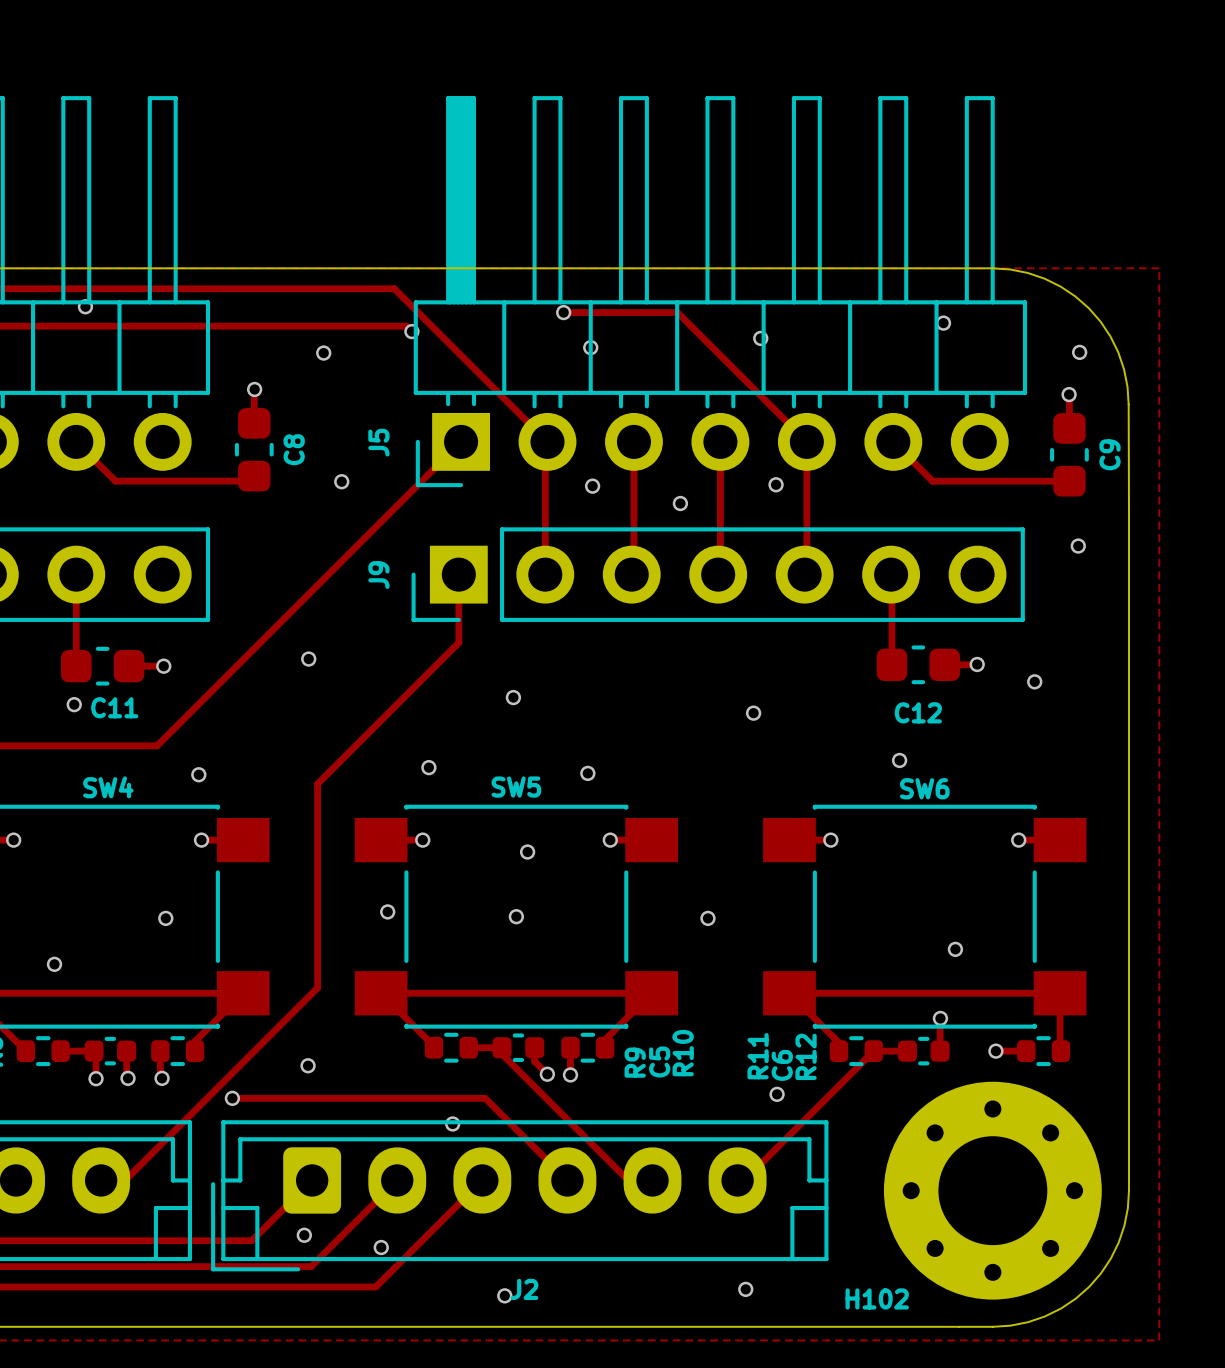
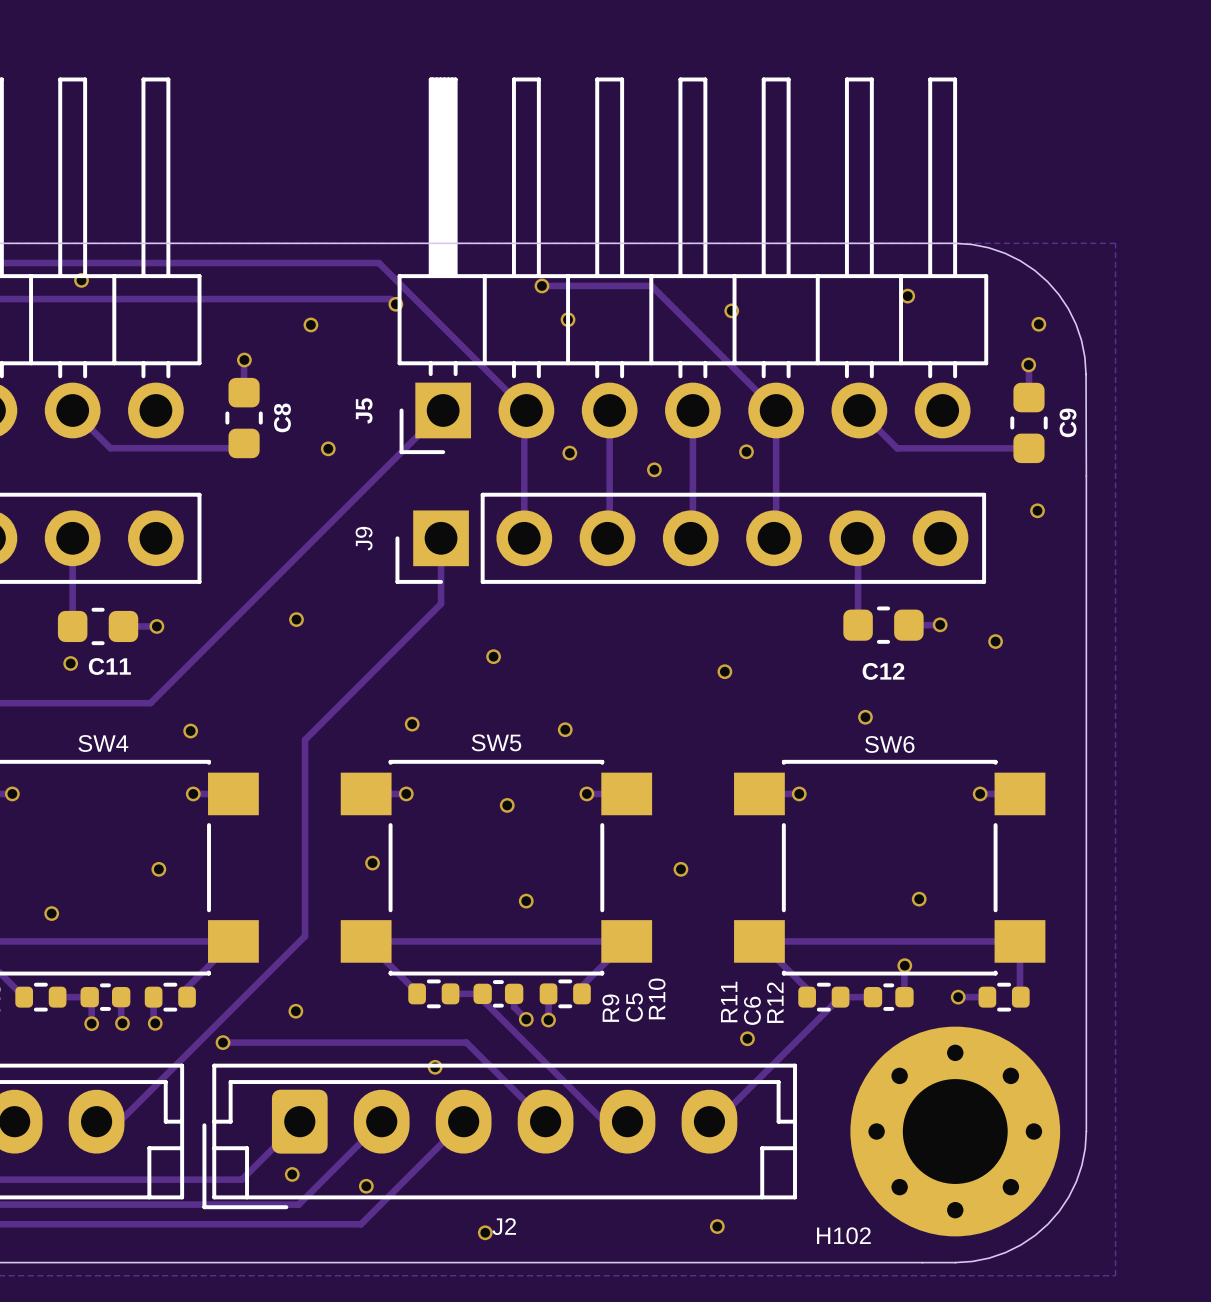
via position: (516, 916) -> (526, 901)

